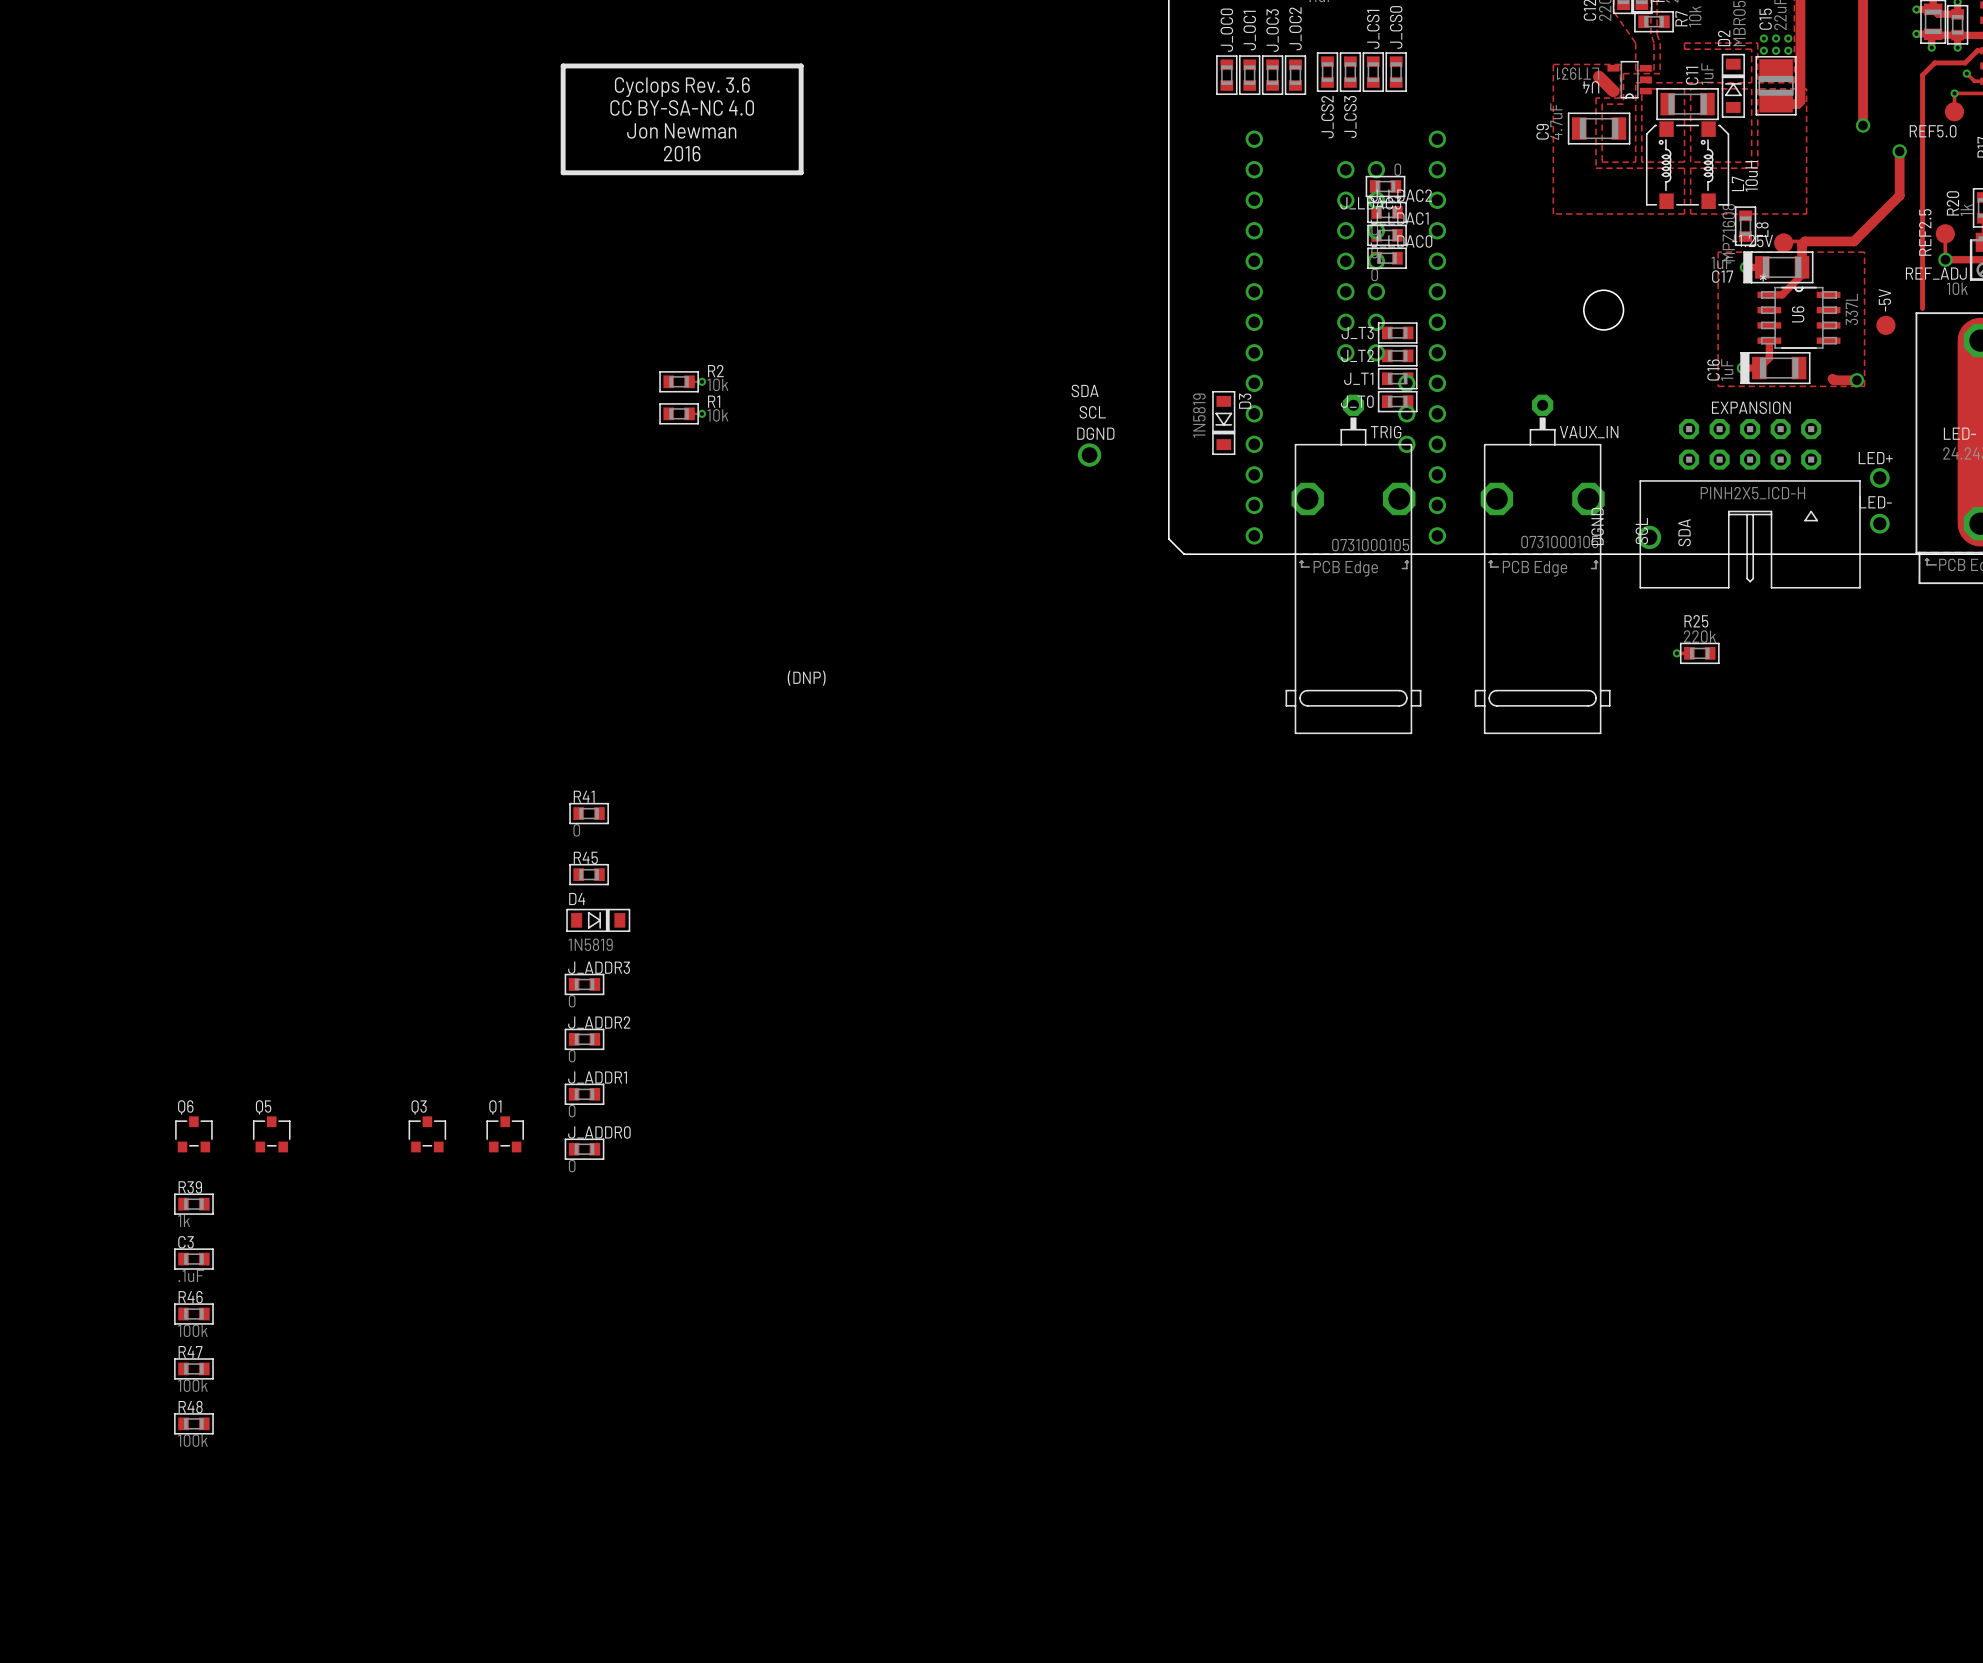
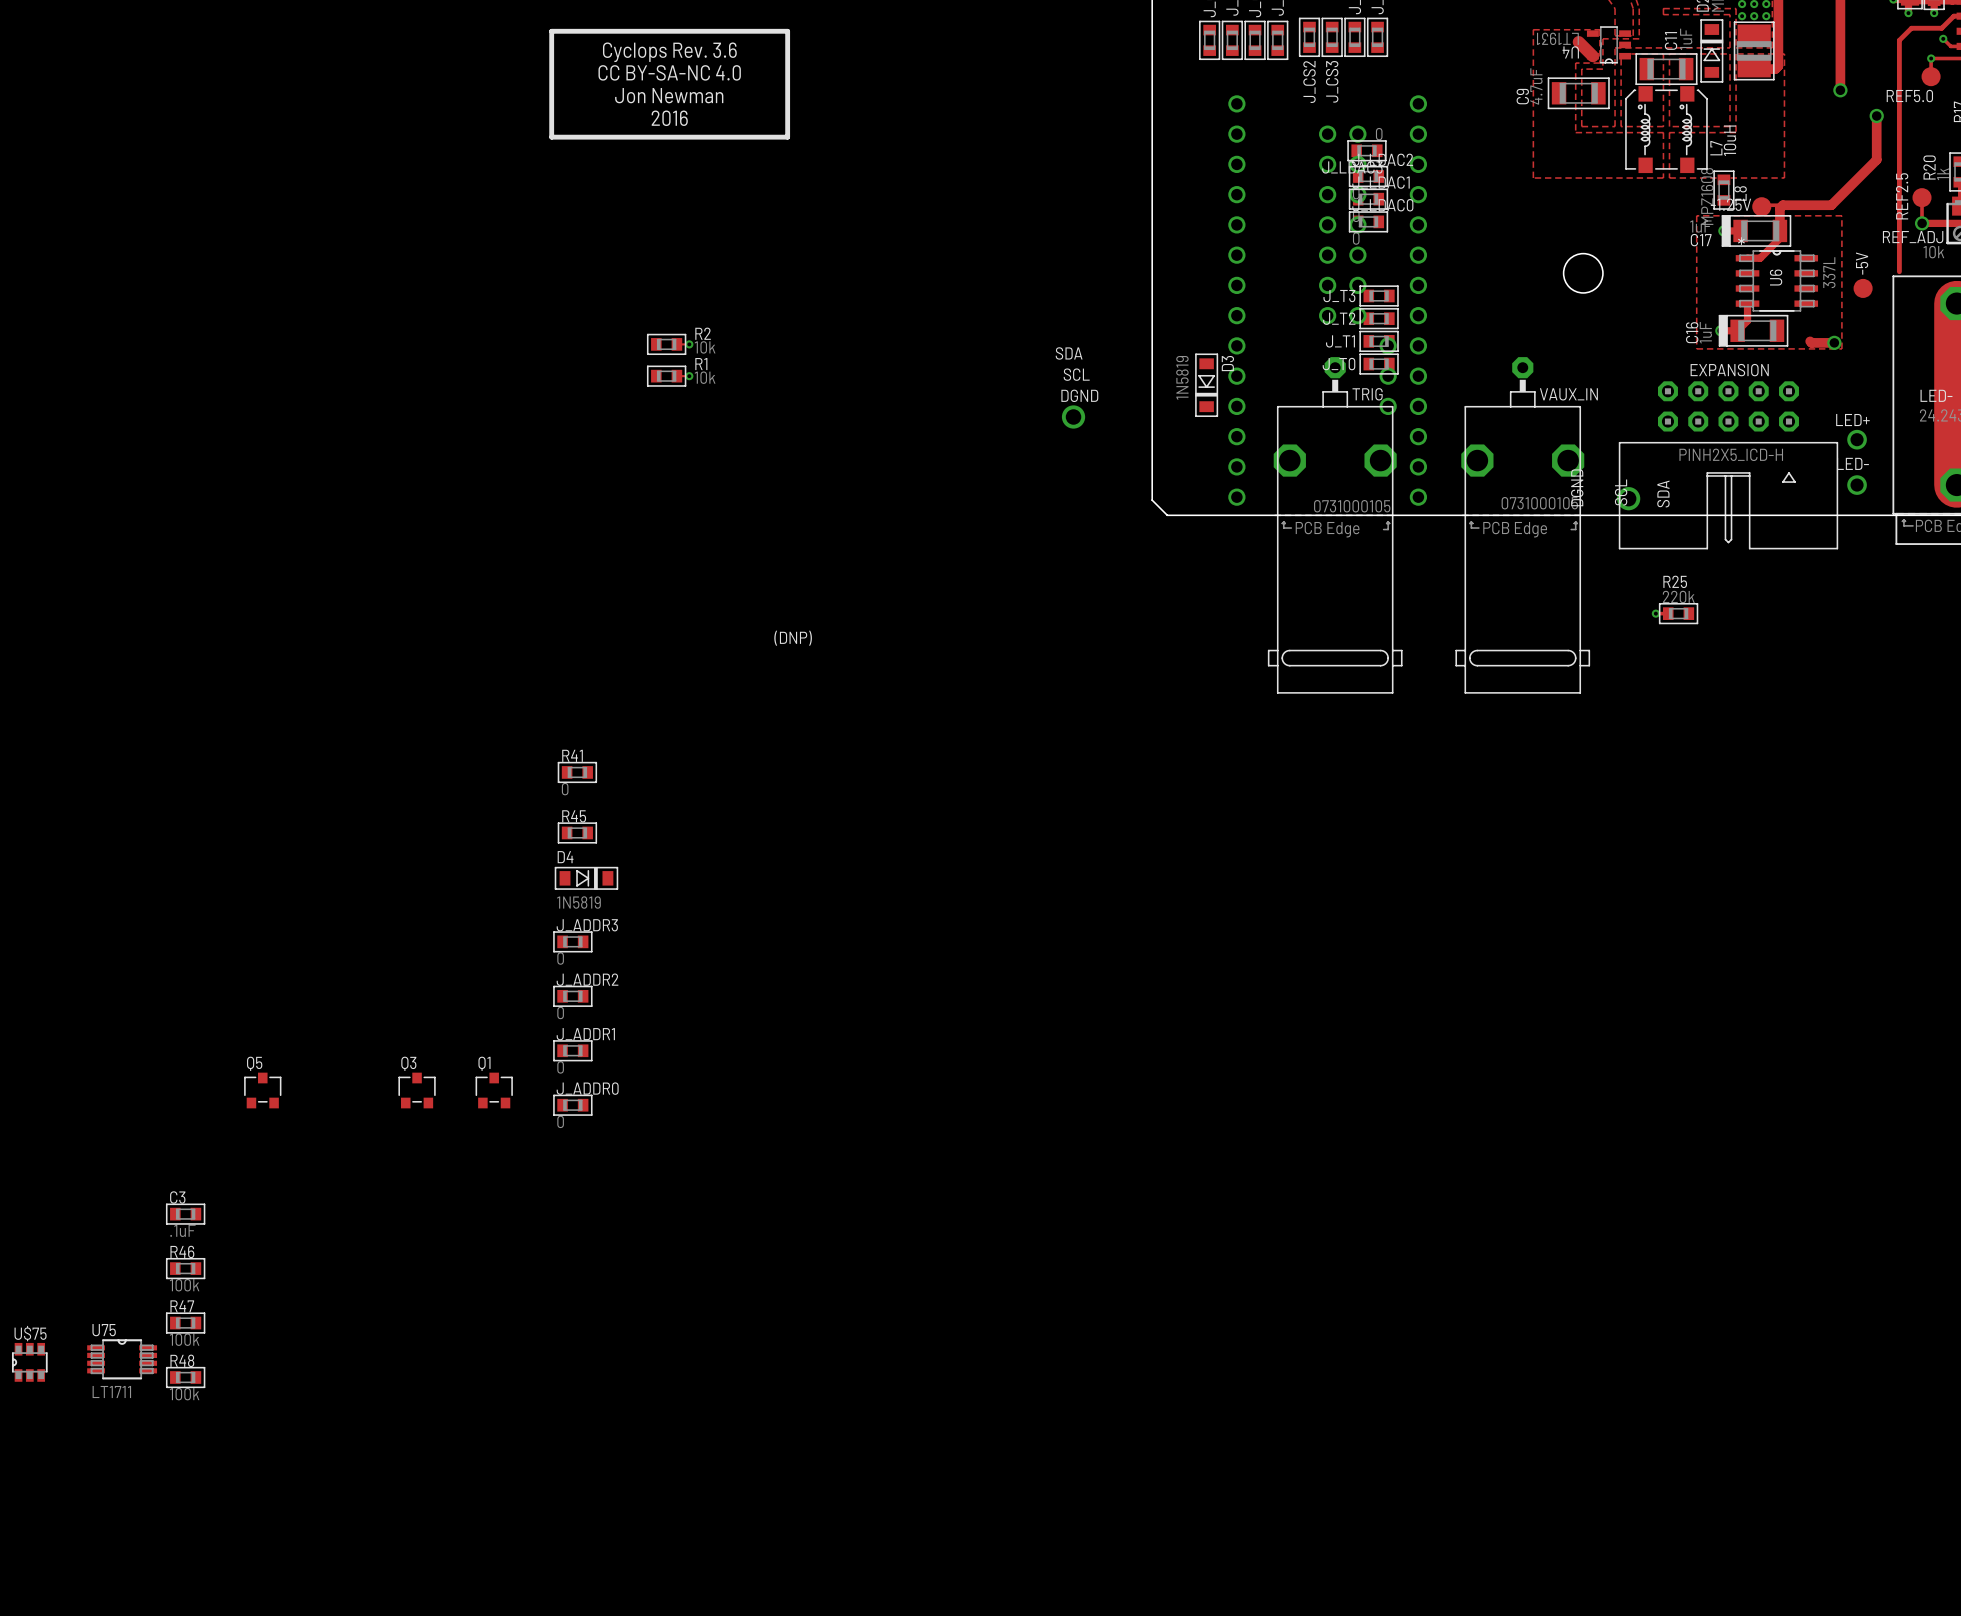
Q6: (193, 1134) -> none
R39: 1k (193, 1204) -> none
U75: none -> LT1711 (122, 1359)
U$75: none -> (29, 1362)

